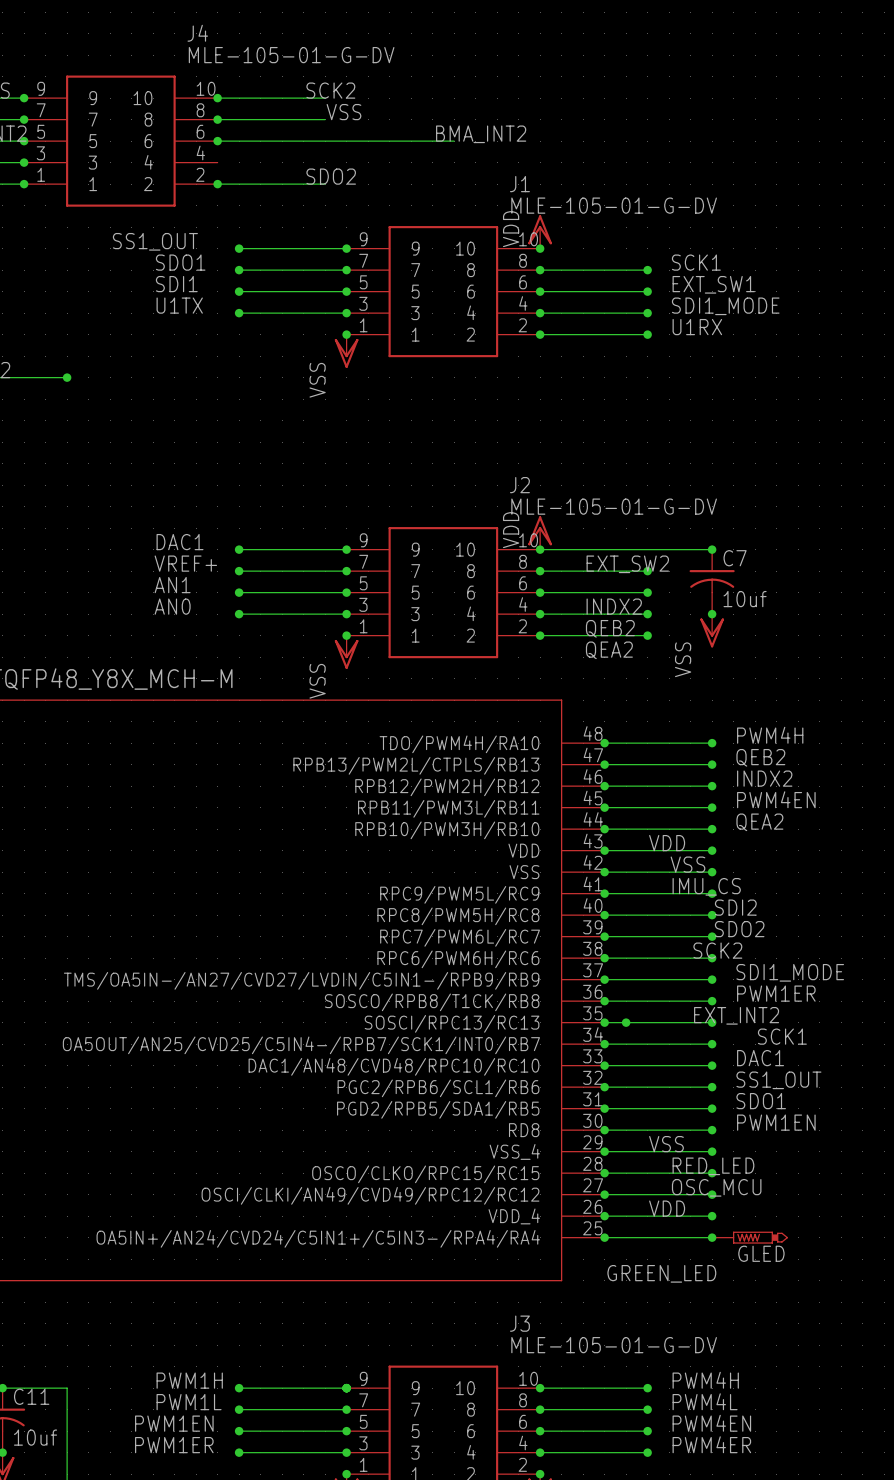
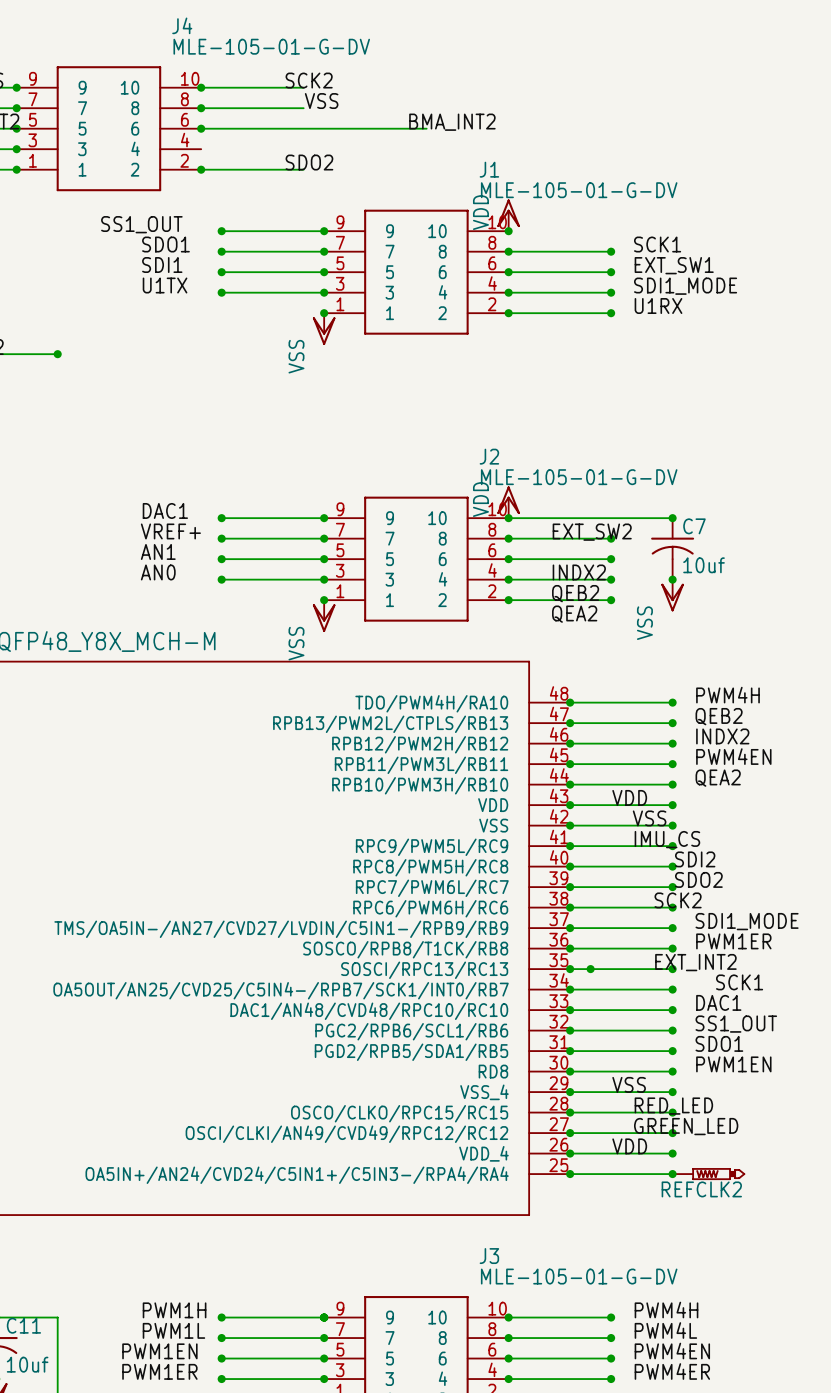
label: OSC_MCU (716, 1187) -> GREEN_LED (686, 1126)
GLED name: GLED (761, 1253) -> REFCLK2 (701, 1189)
label: GREEN_LED (661, 1273) -> none

